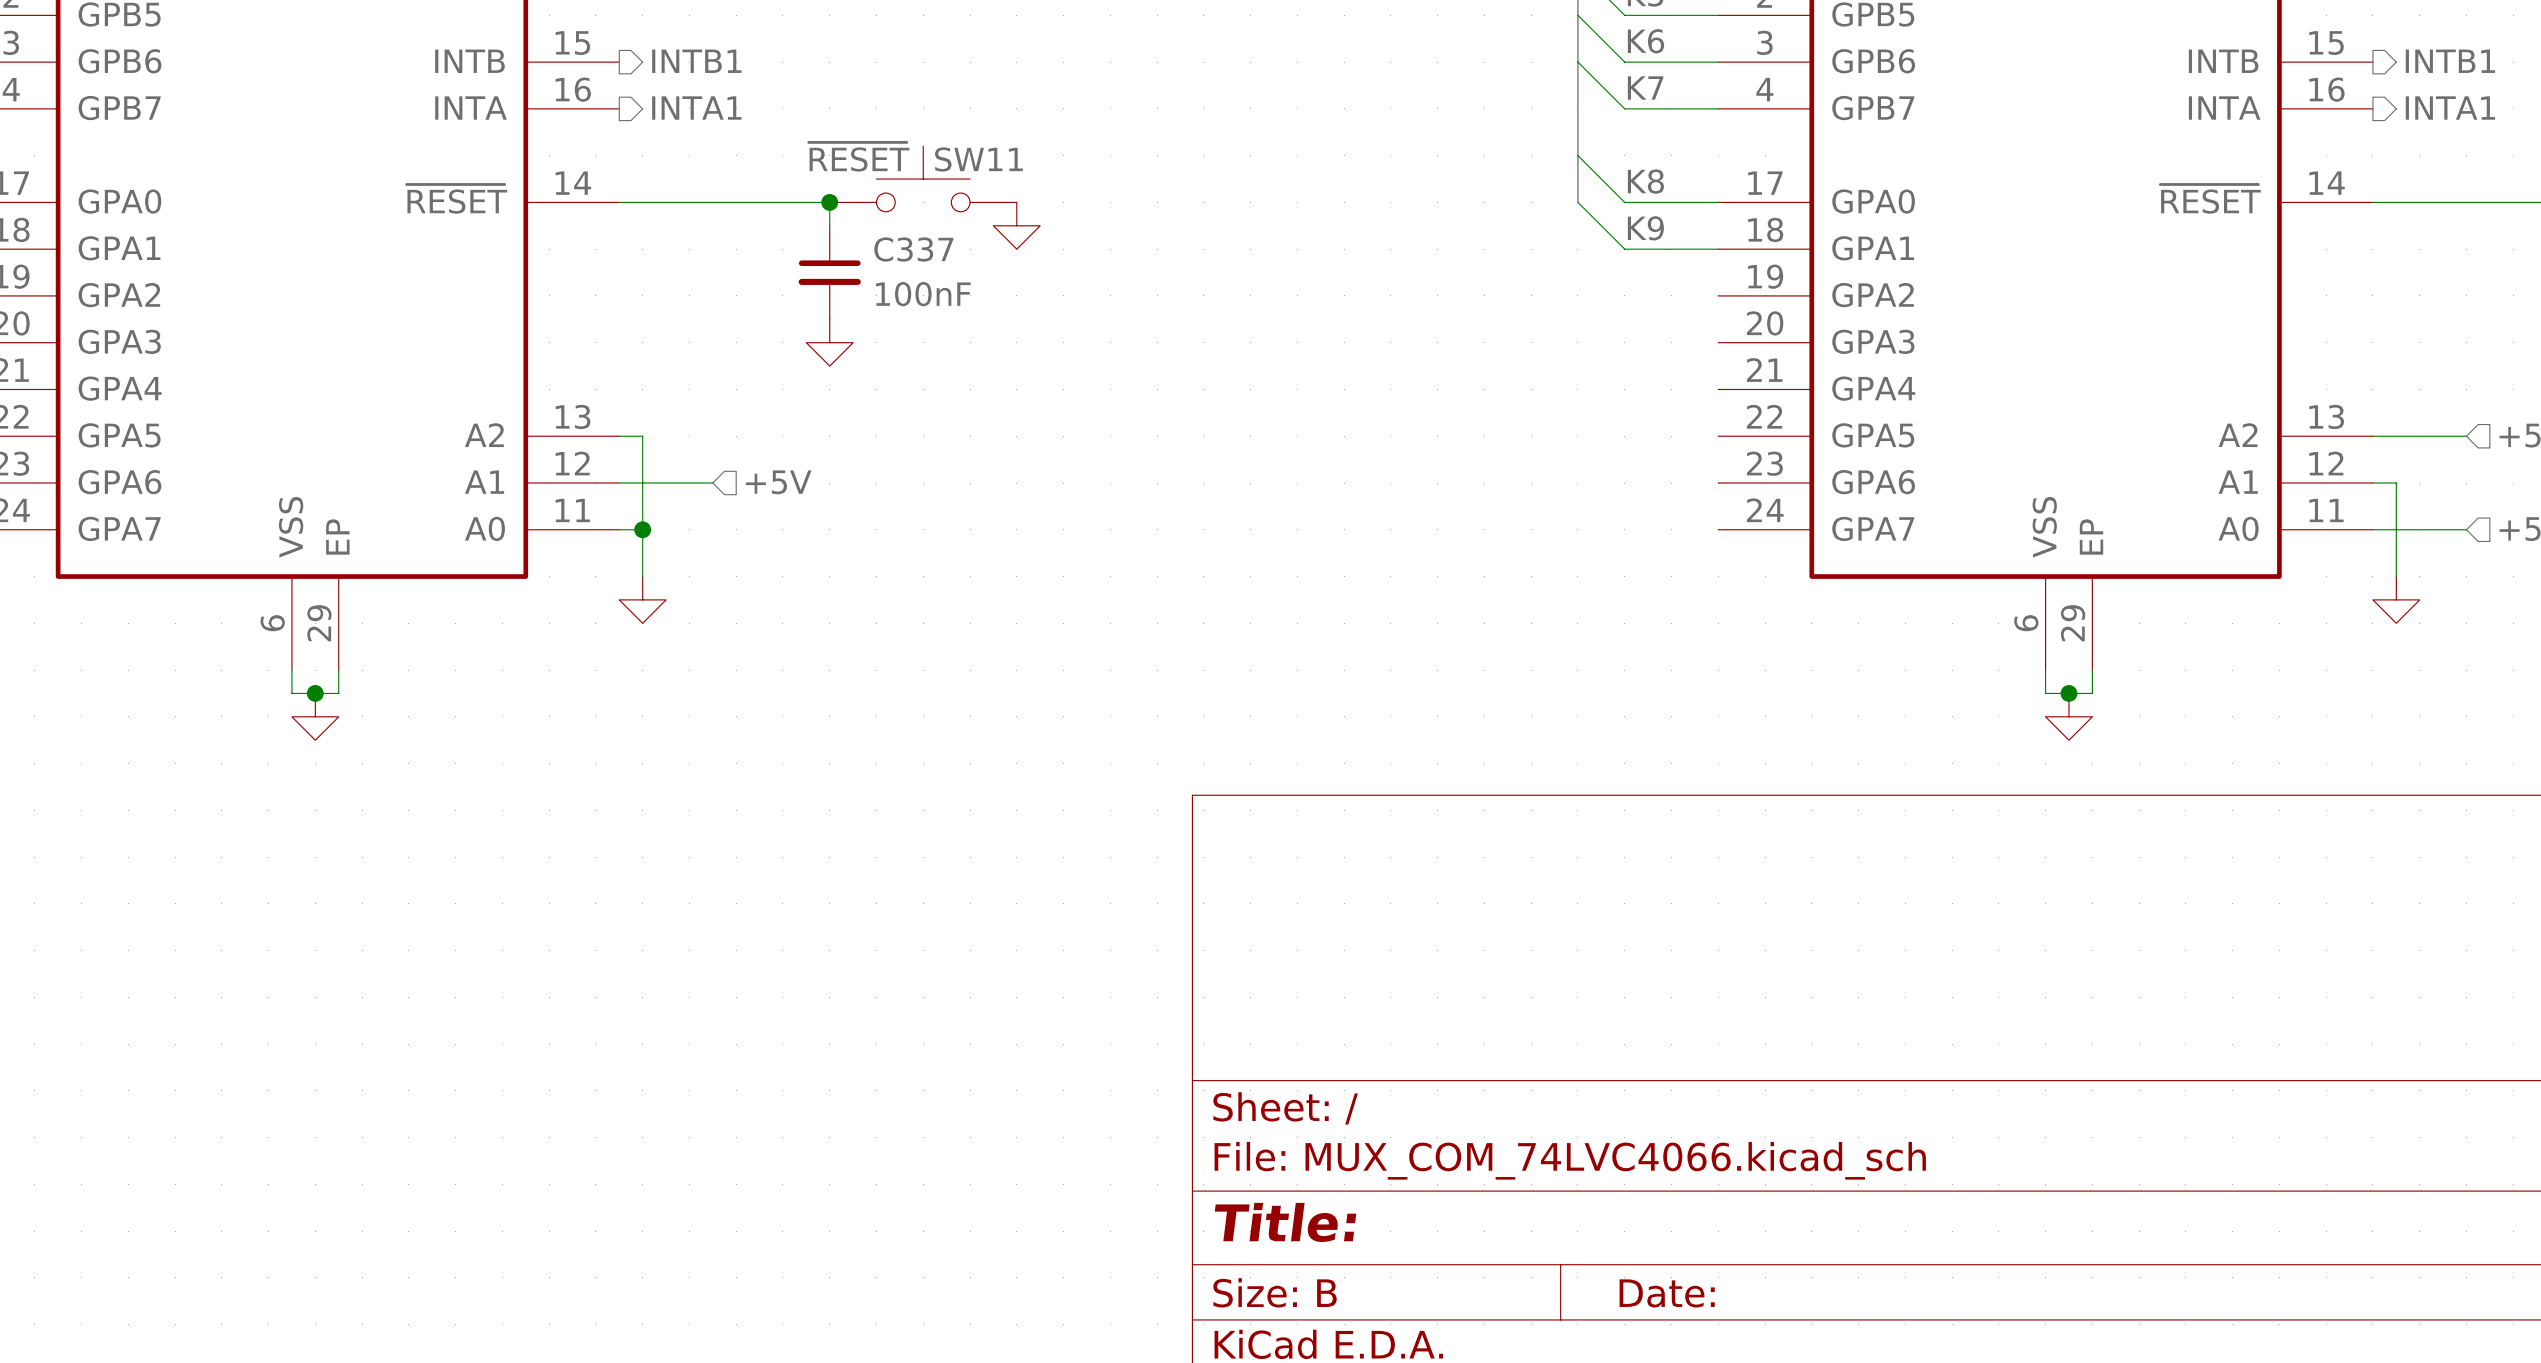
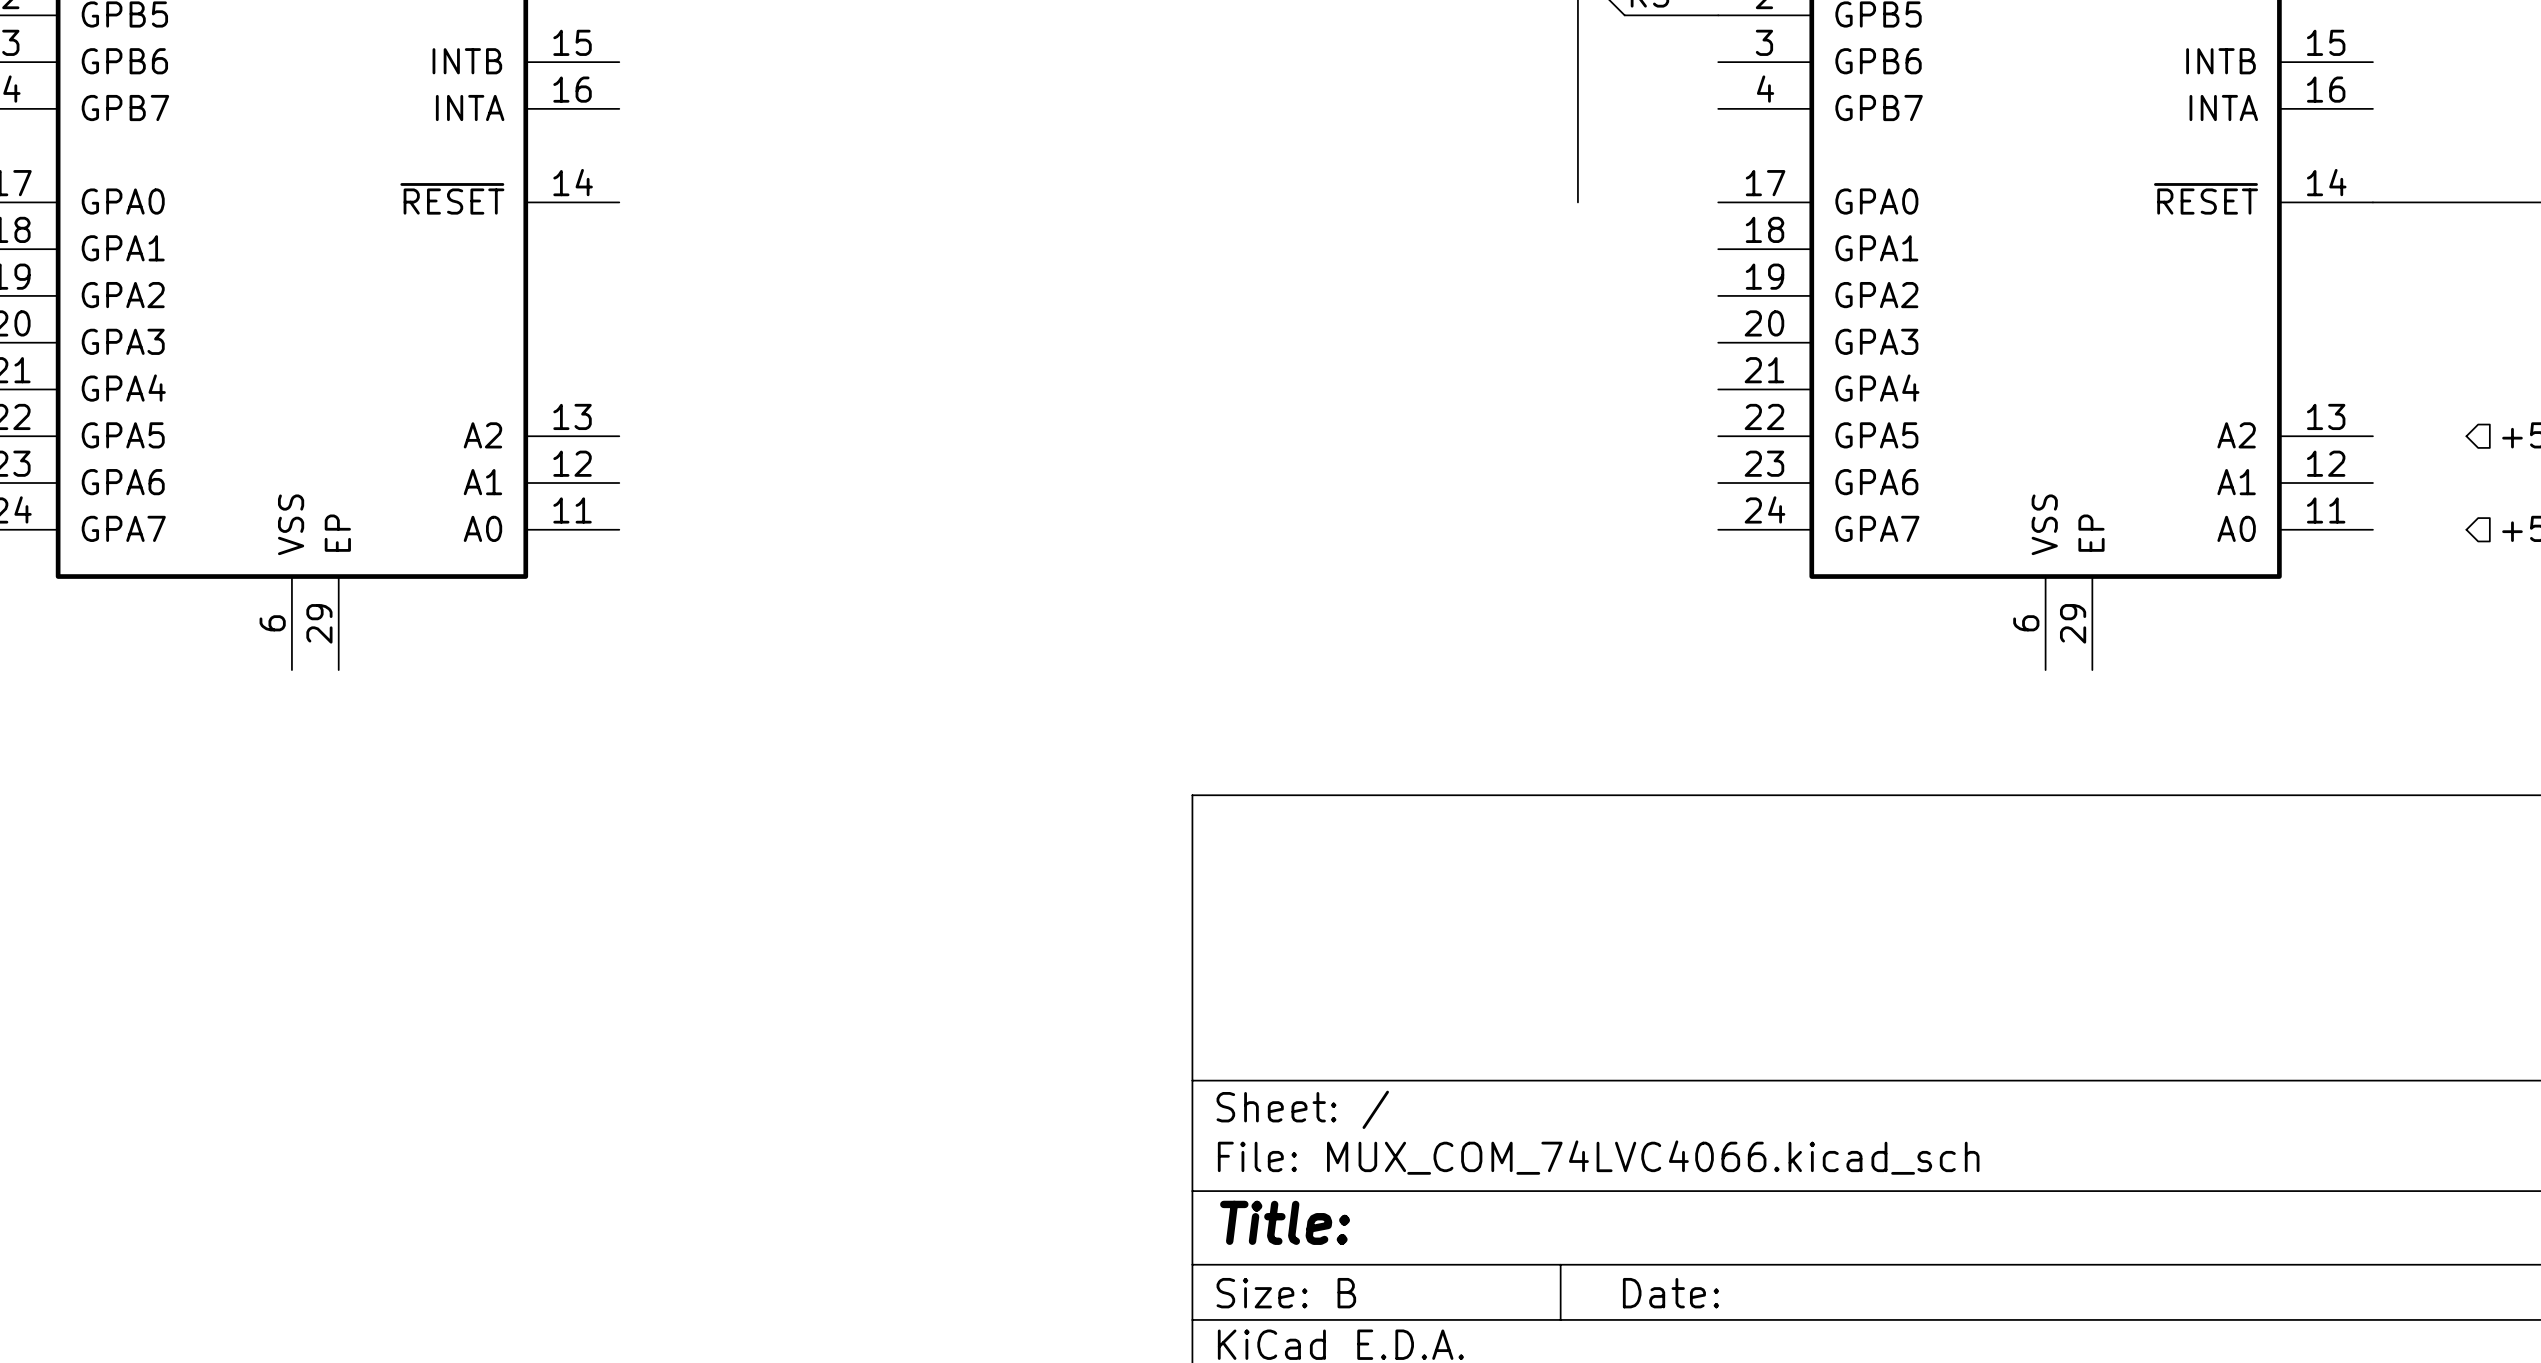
wire: (1577, 15) (1624, 62) (1718, 62) -> none
label: K6 (1646, 41) -> none
hierarchical label: INTB1 (696, 61) -> none
hierarchical label: INTB1 (2450, 61) -> none
wire: (1577, 62) (1624, 108) (1718, 108) -> none
label: K7 (1645, 88) -> none
hierarchical label: INTA1 (696, 108) -> none
hierarchical label: INTA1 (2450, 108) -> none
wire: (1577, 155) (1624, 202) (1718, 202) -> none
SW11: ~{RESET} (923, 179) -> none
label: K8 (1645, 181) -> none
wire: (619, 202) (829, 202) (829, 225) -> none
junction: (829, 202) -> none
wire: (1577, 202) (1624, 249) (1718, 249) -> none
power symbol: (1016, 225) -> none
label: K9 (1645, 228) -> none
C337: 100nF (829, 272) -> none
power symbol: (829, 342) -> none
wire: (619, 436) (642, 436) (642, 576) -> none
wire: (2372, 436) (2466, 436) -> none
hierarchical label: +5V (778, 482) -> none
wire: (619, 483) (712, 483) -> none
wire: (2372, 483) (2396, 483) (2396, 576) -> none
wire: (619, 529) (642, 529) -> none
junction: (642, 529) -> none
wire: (2372, 529) (2466, 529) -> none
power symbol: (642, 599) -> none
power symbol: (2396, 599) -> none
wire: (291, 670) (291, 693) (338, 693) (338, 670) -> none
wire: (2045, 670) (2045, 693) (2092, 693) (2092, 670) -> none
junction: (315, 693) -> none
junction: (2068, 693) -> none
power symbol: (315, 716) -> none
power symbol: (2068, 716) -> none

